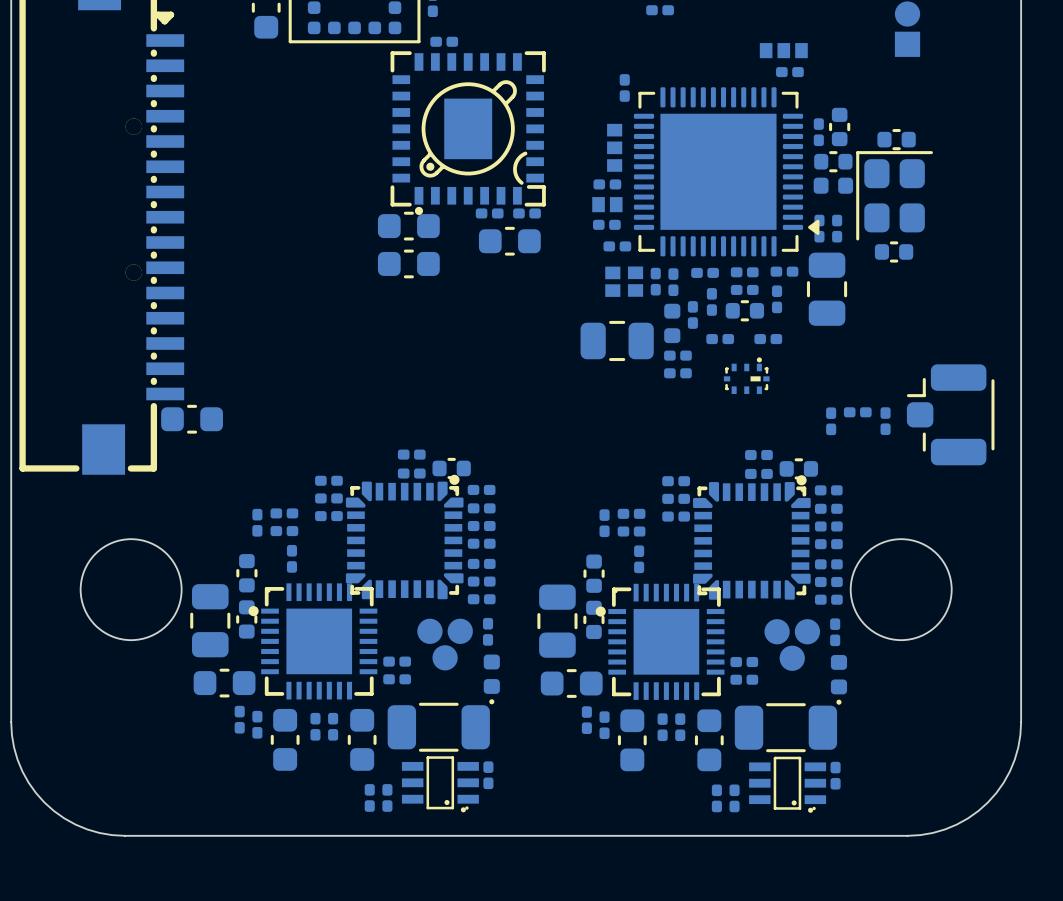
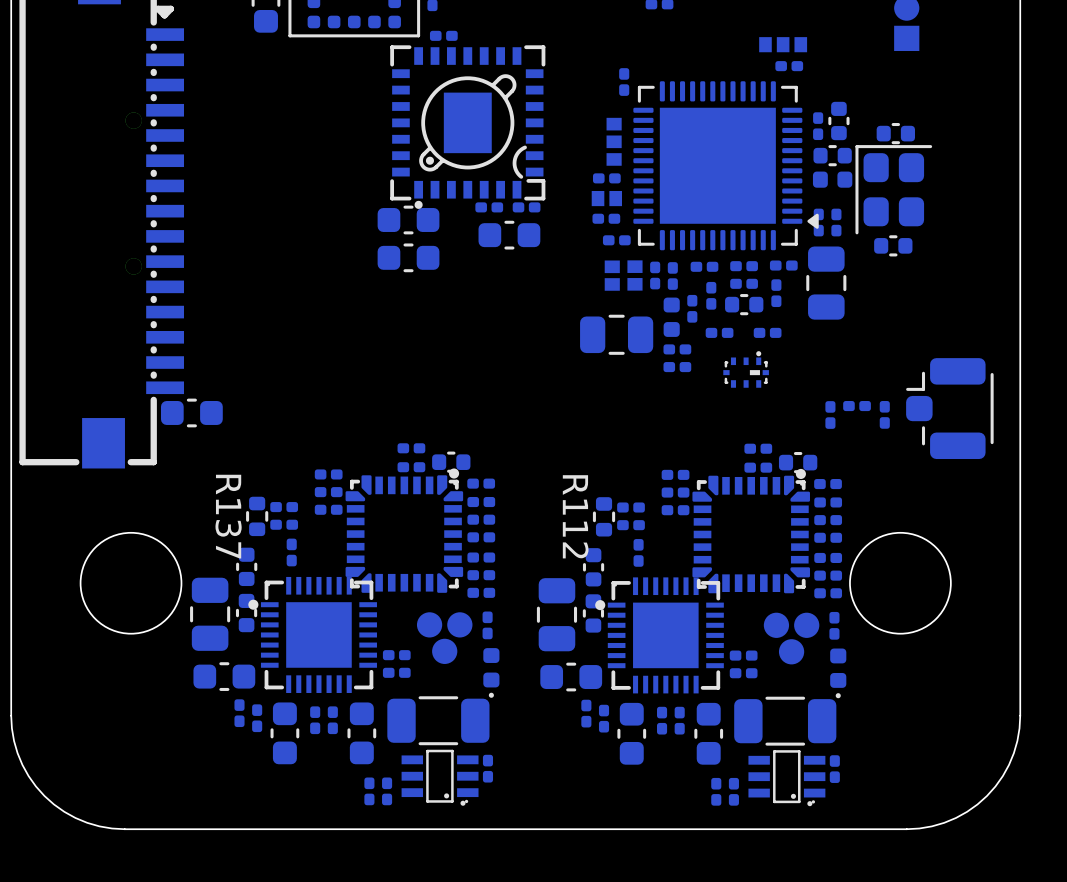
part: (257, 522) -> none
R137: none -> (257, 516)
part: (604, 523) -> none
R112: none -> (604, 516)

